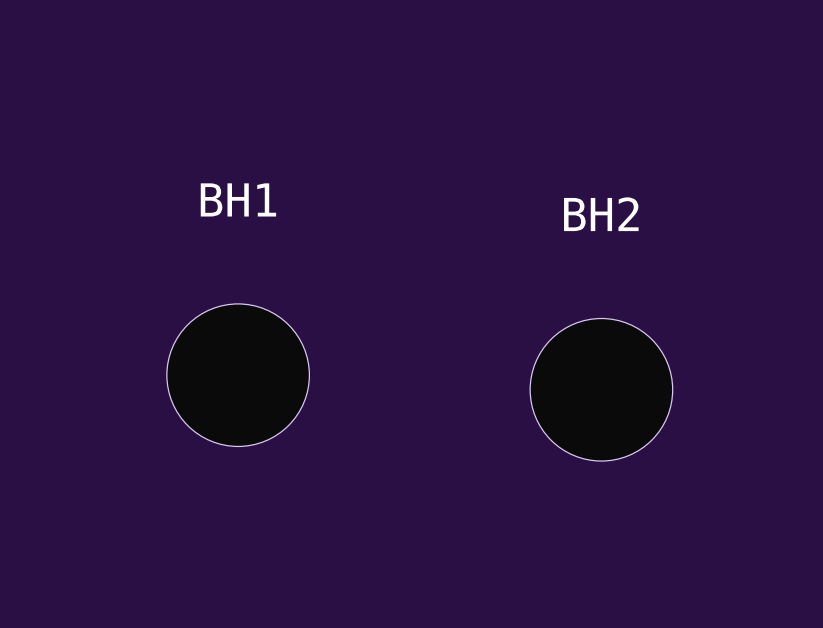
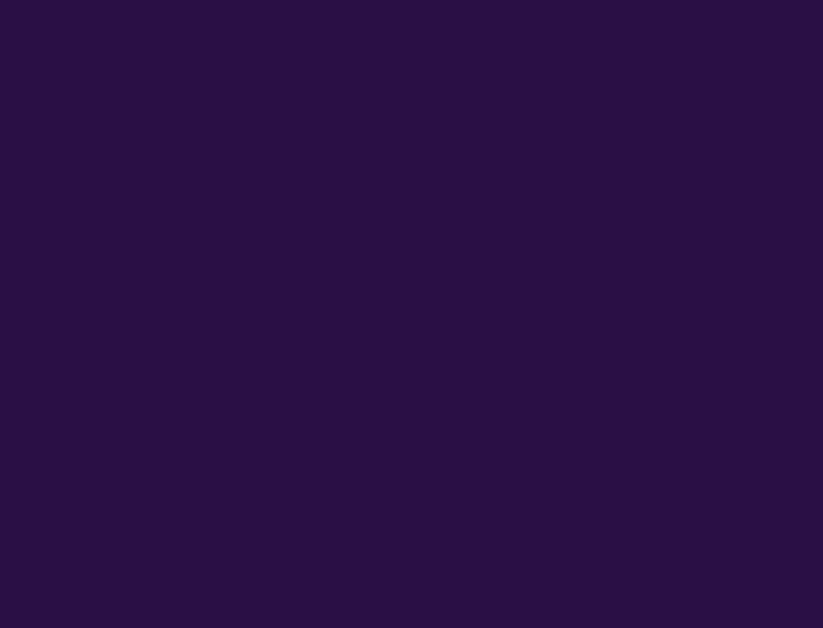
BH1: (238, 375) -> none
BH2: (601, 389) -> none

